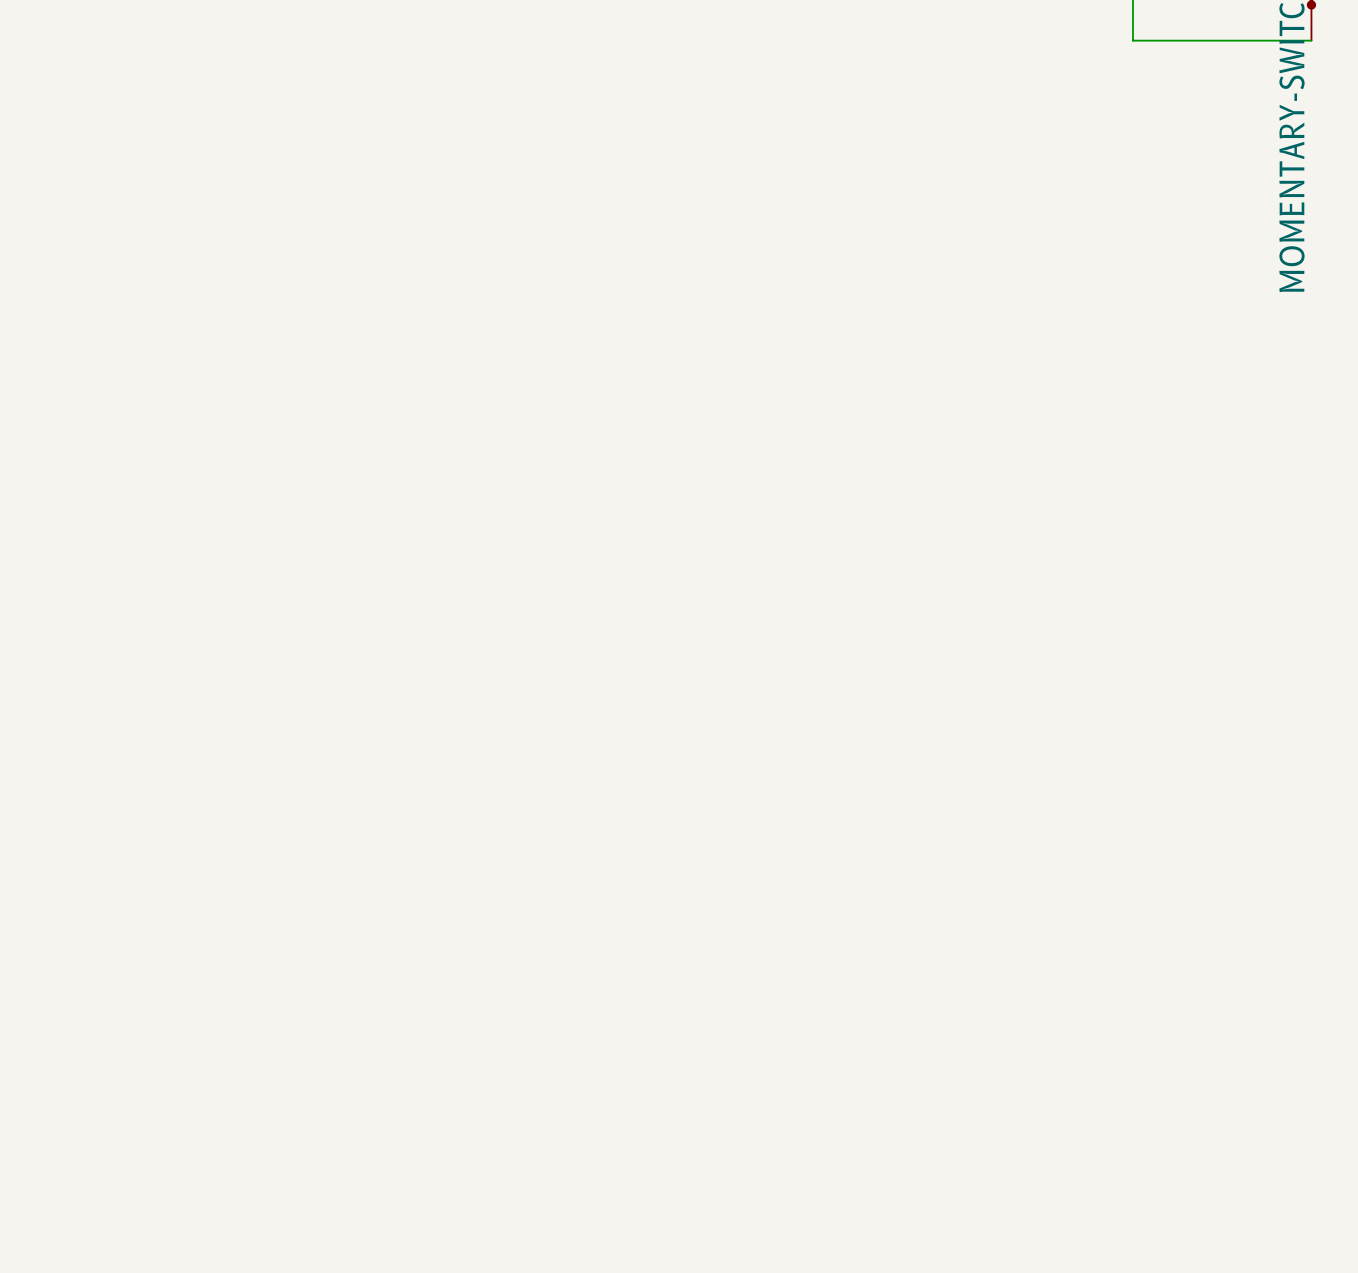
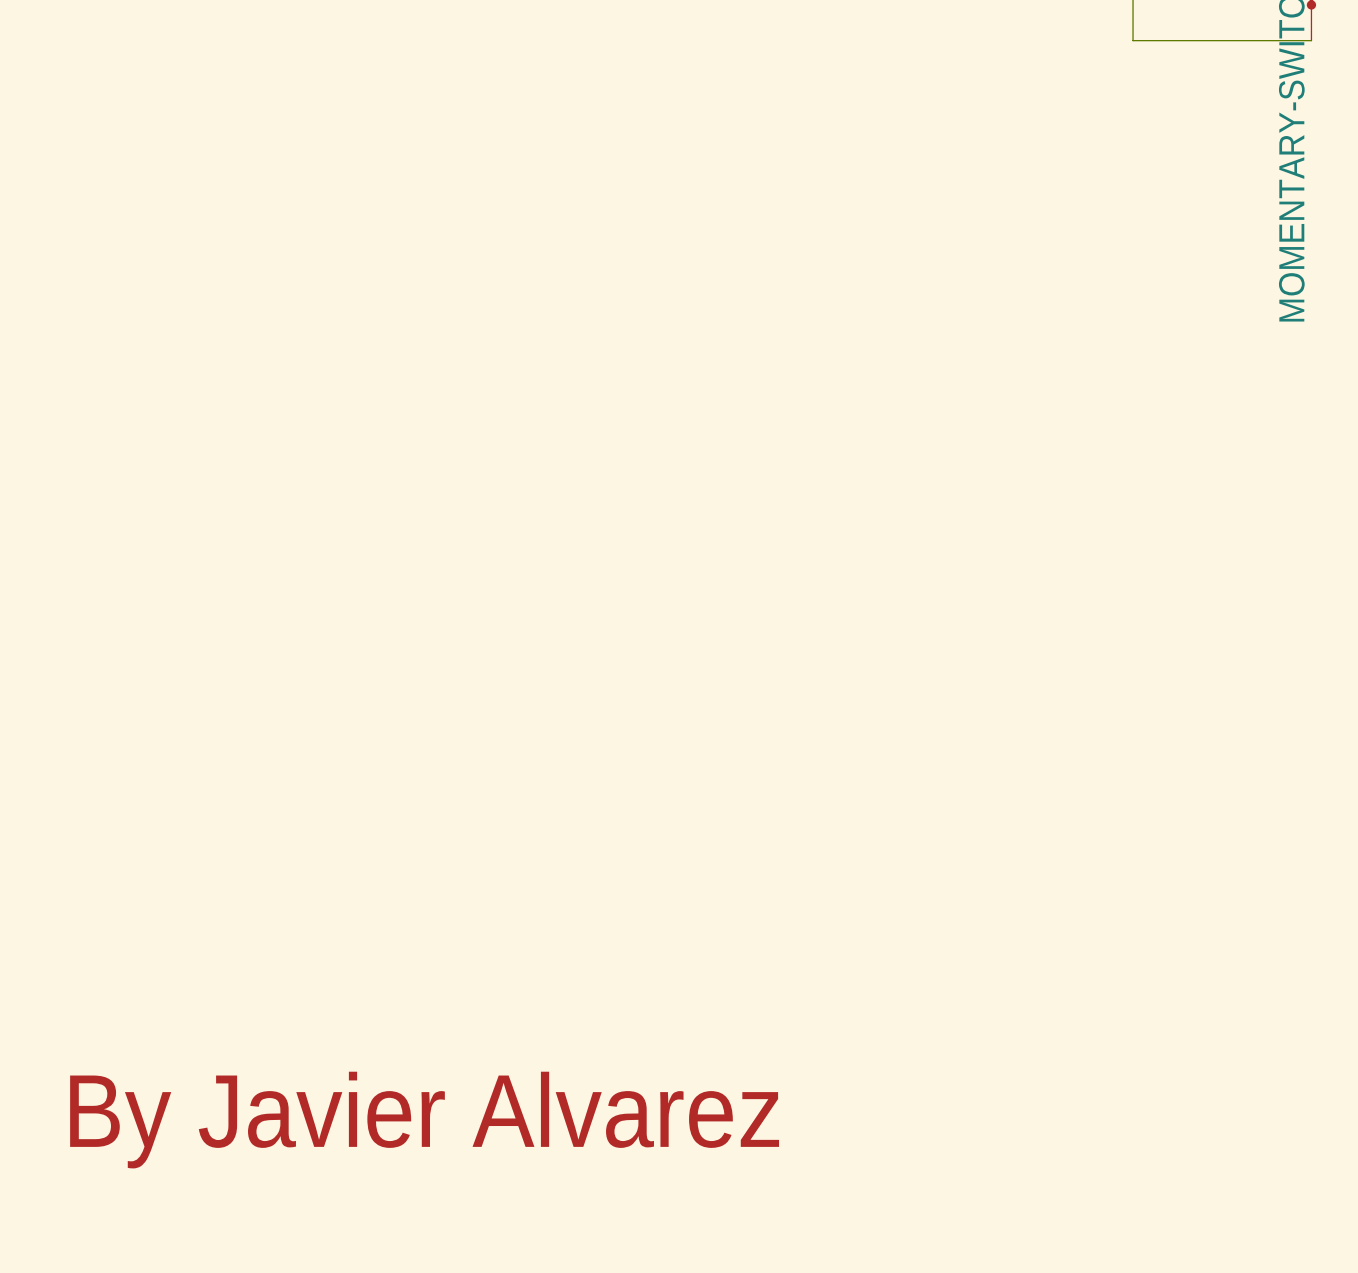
text: none -> By Javier Alvarez (424, 1120)

